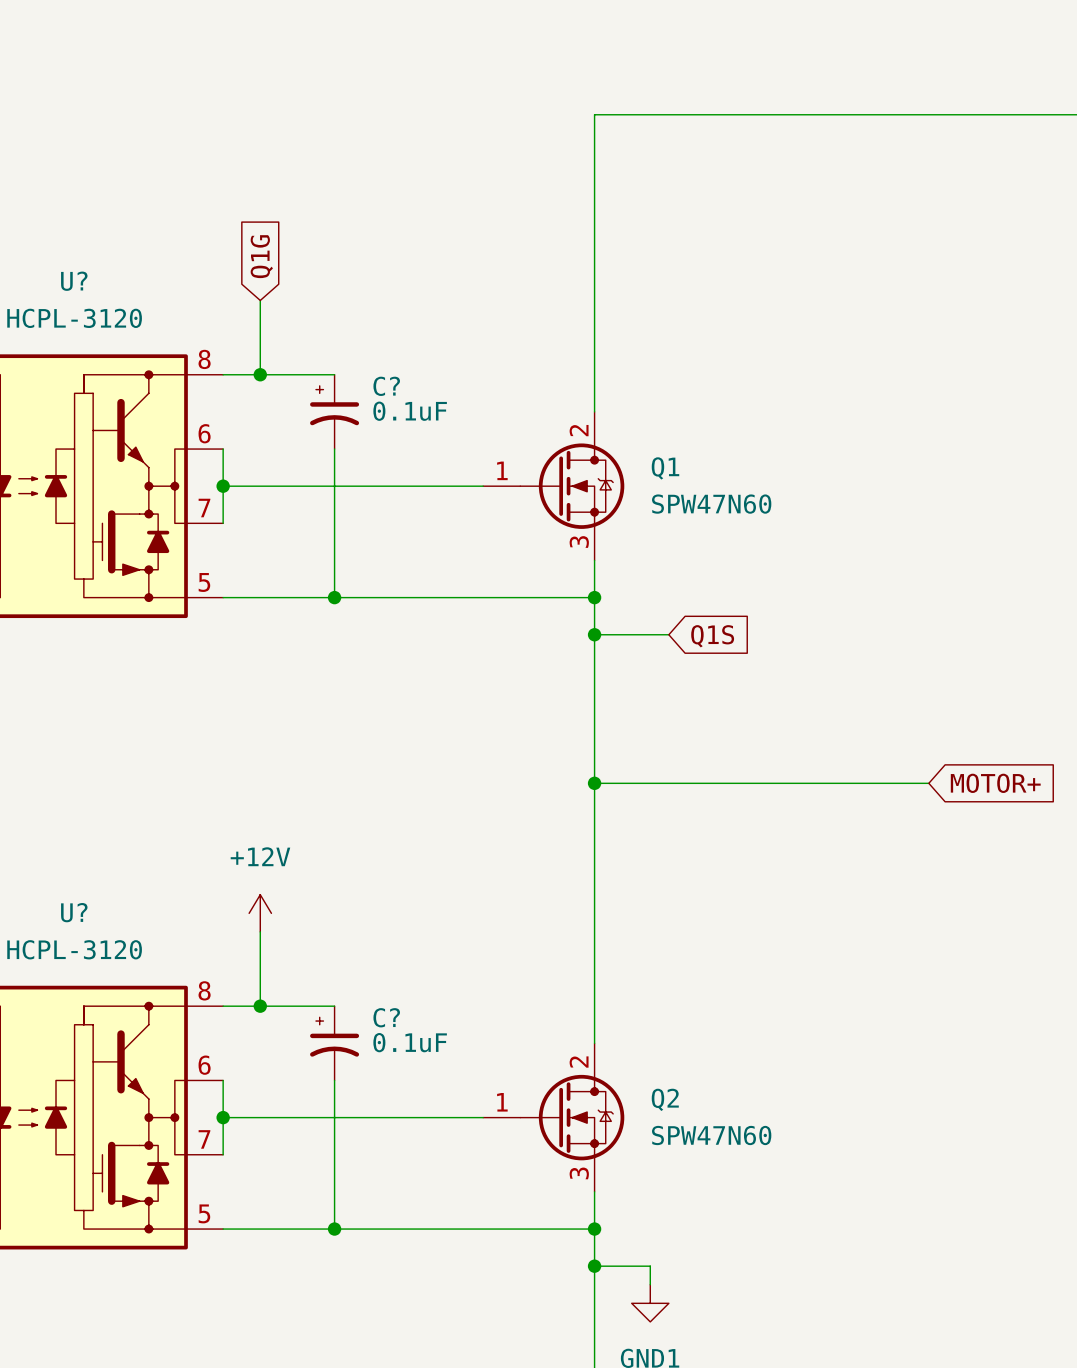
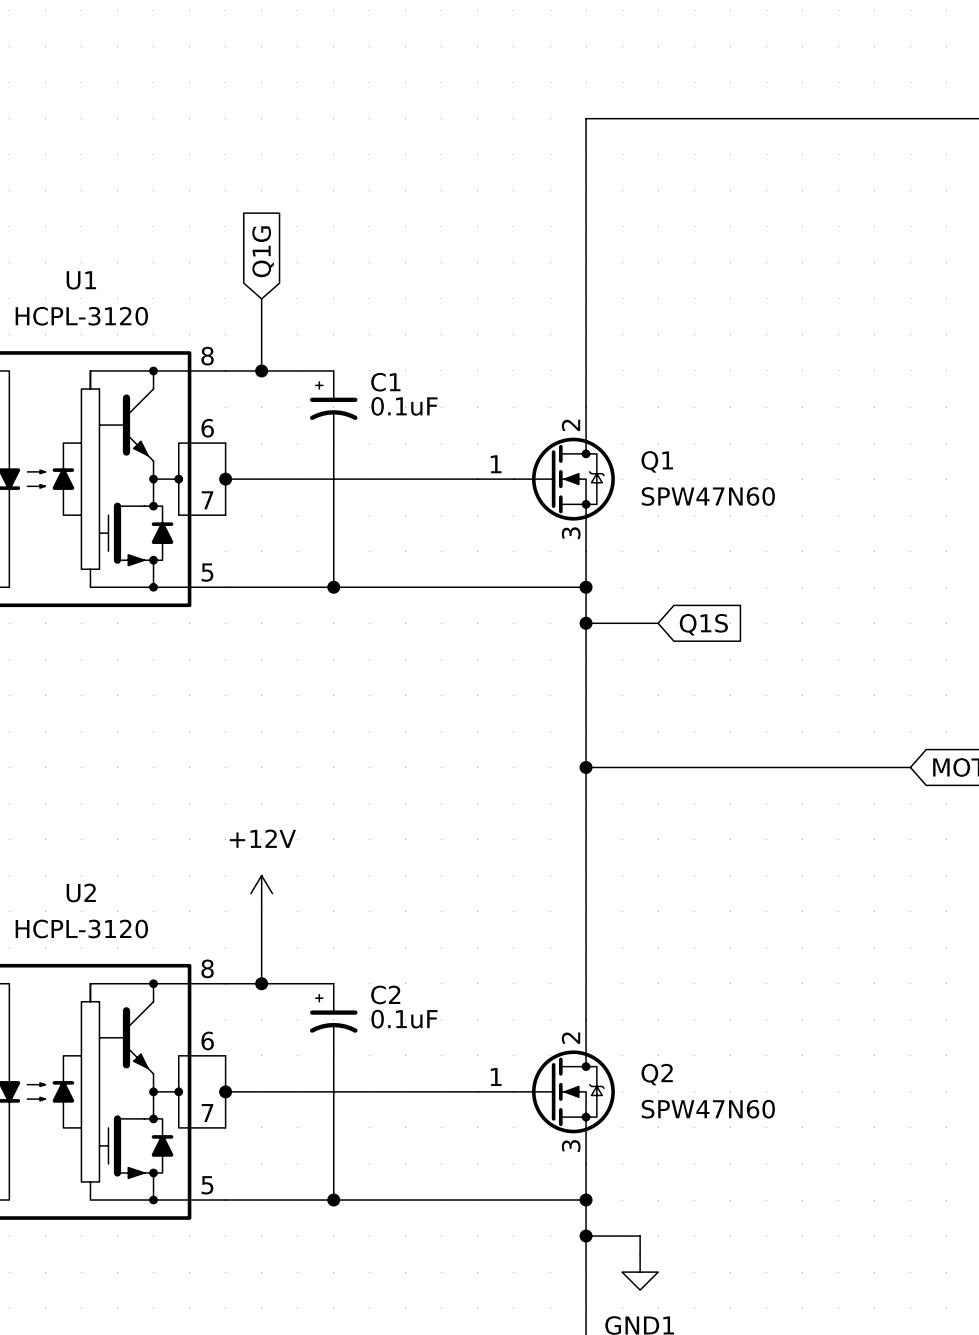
U? name: U? (74, 281) -> U1 (81, 280)
C? name: C? (386, 386) -> C1 (385, 382)
U? name: U? (74, 912) -> U2 (81, 892)
C? name: C? (386, 1017) -> C2 (385, 994)

